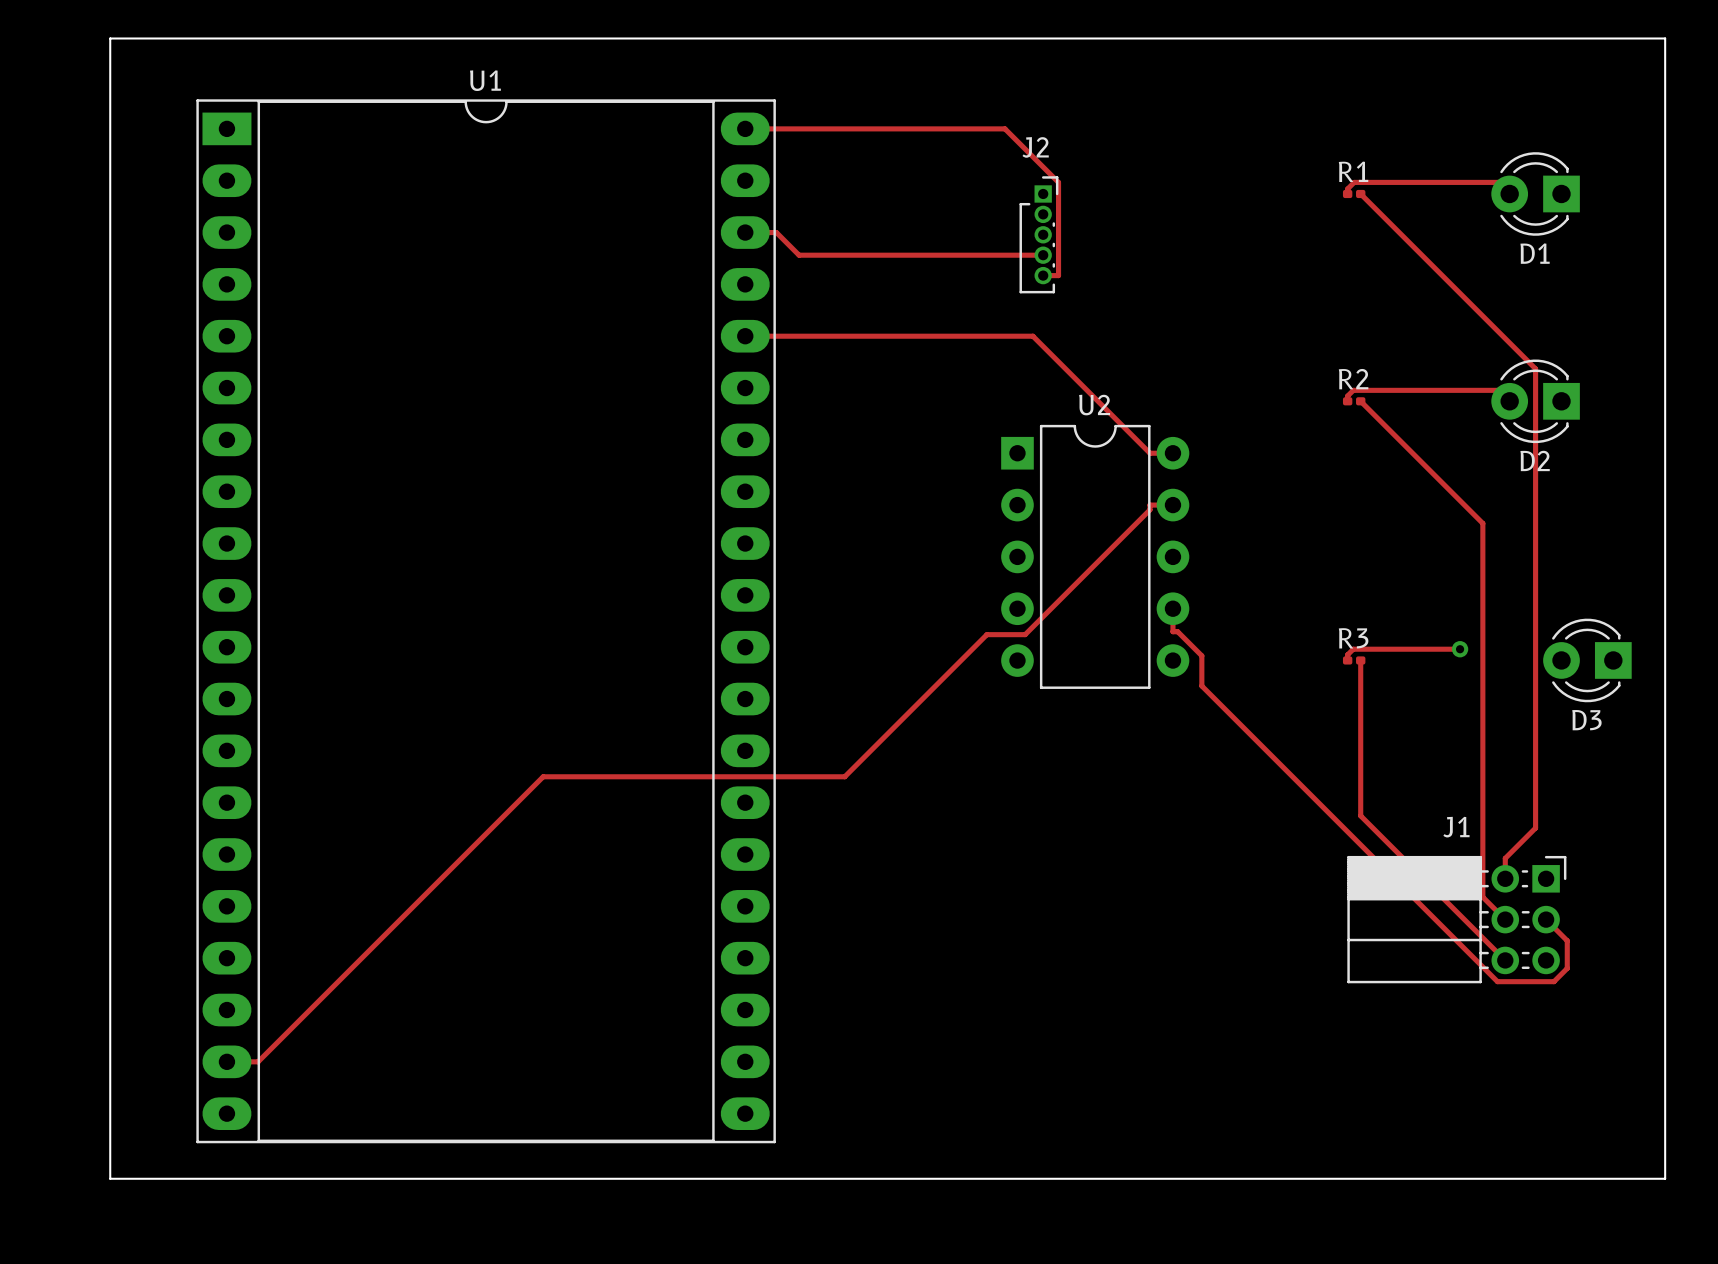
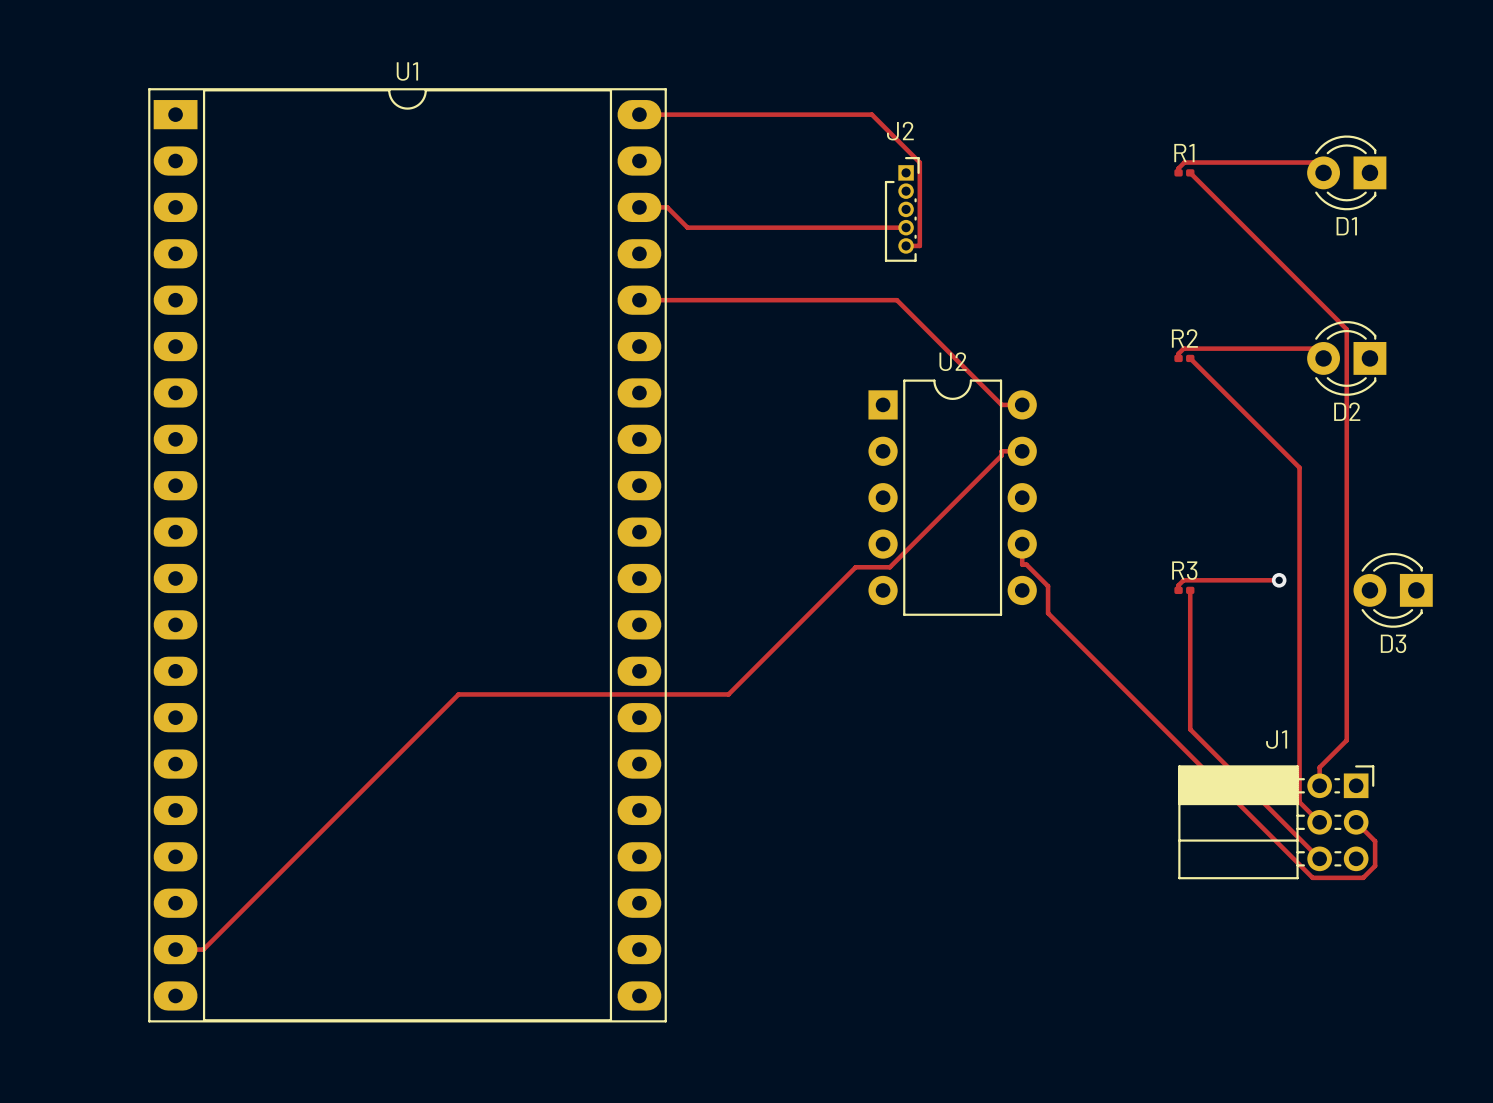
board edge: (110, 38) (1665, 38) (1665, 1178) (110, 1178) (110, 38) -> none

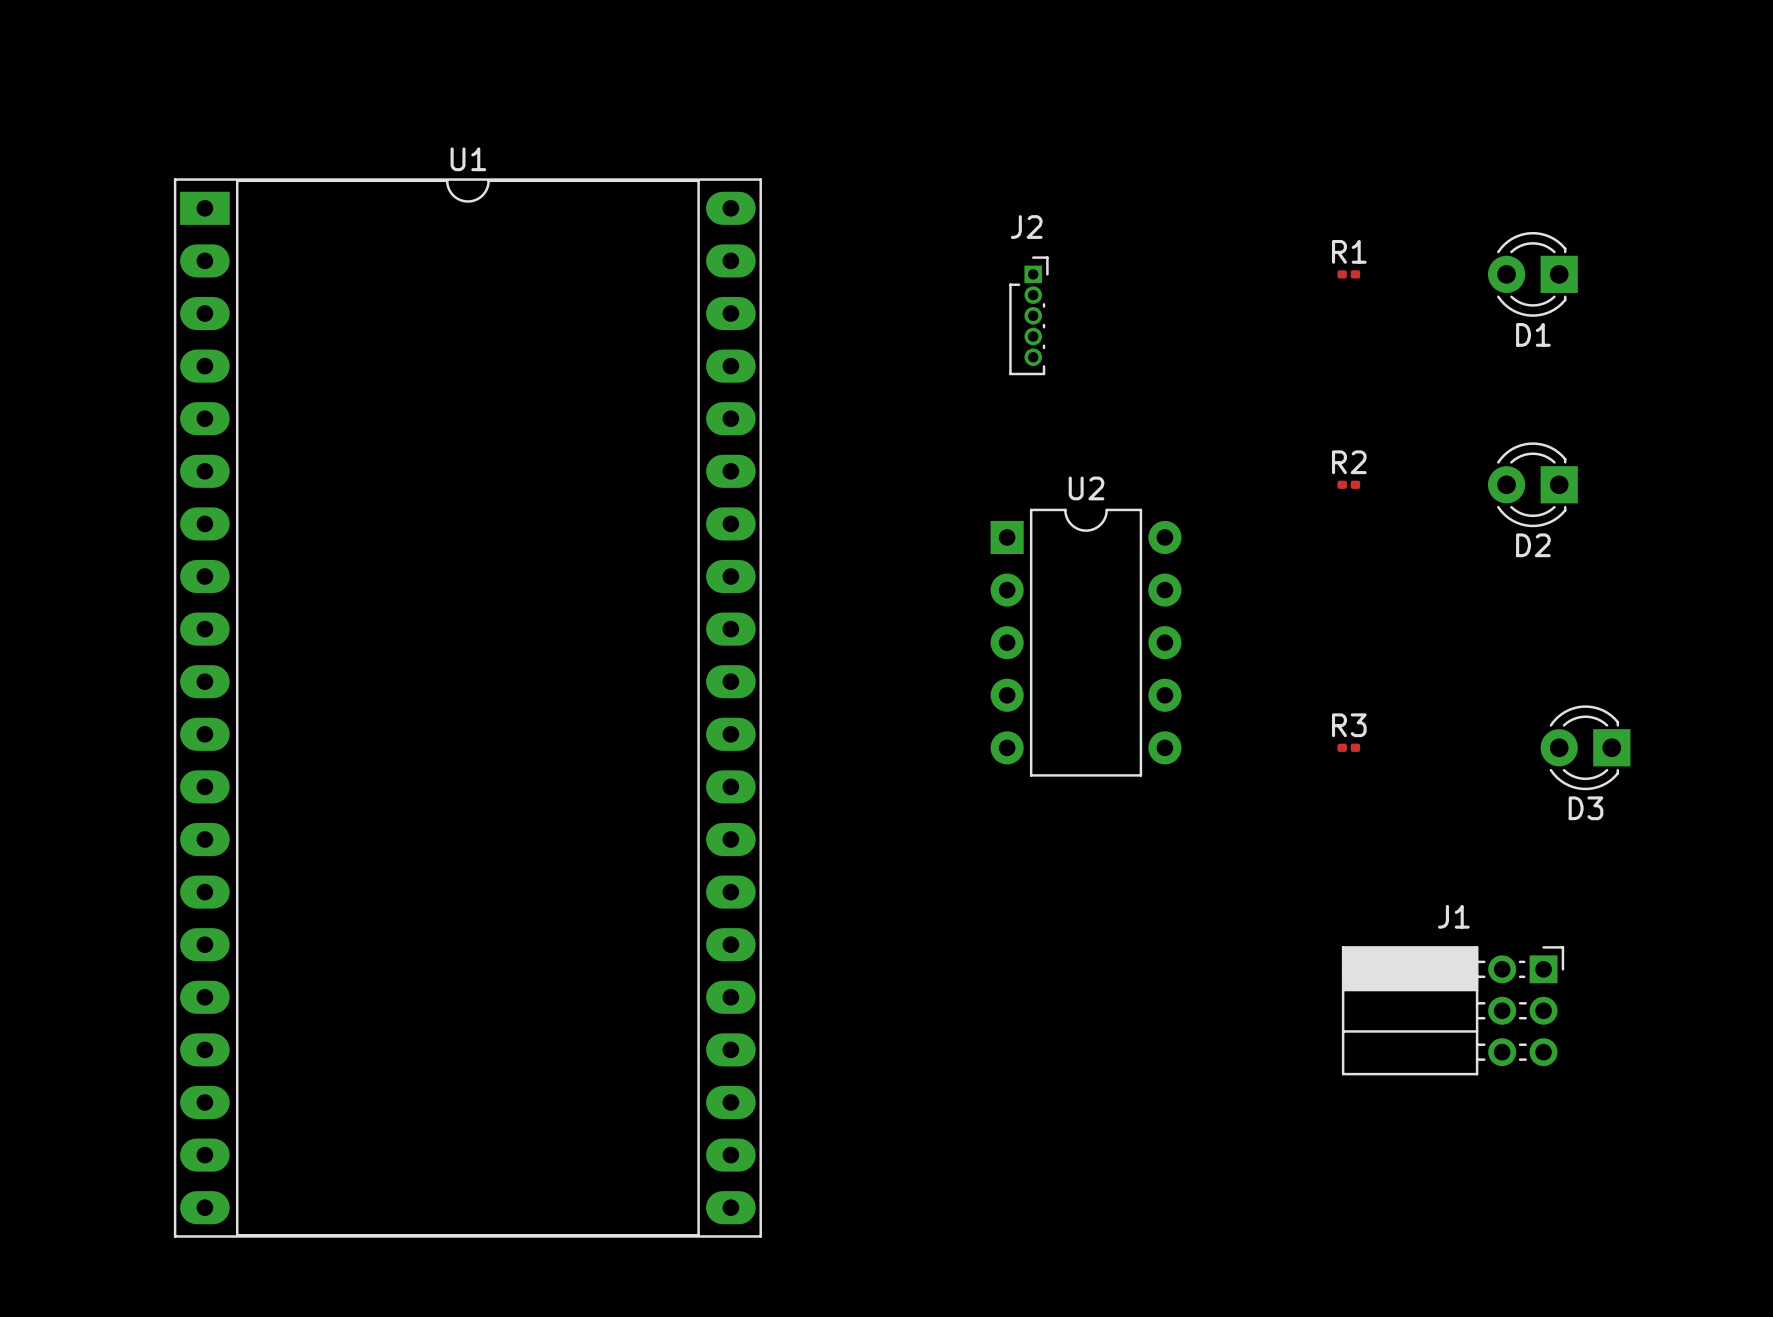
track: (639, 114) (871, 114) (919, 162) (919, 245) (906, 245) -> none
track: (1178, 172) (1178, 168) (1184, 162) (1313, 162) (1323, 172) -> none
track: (1190, 172) (1346, 329) (1346, 740) (1319, 767) (1319, 785) -> none
track: (639, 207) (667, 207) (687, 227) (906, 227) -> none
track: (639, 300) (896, 300) (1001, 404) (1022, 404) -> none
track: (1178, 358) (1178, 353) (1183, 348) (1313, 348) (1323, 358) -> none
track: (1190, 358) (1299, 467) (1299, 802) (1319, 822) -> none
track: (1022, 451) (1001, 451) (1001, 455) (889, 567) (855, 567) (728, 694) (458, 694) (203, 949) (175, 949) -> none
track: (1022, 544) (1022, 564) (1026, 564) (1048, 586) (1048, 613) (1312, 877) (1363, 877) (1375, 865) (1375, 841) (1356, 822) -> none
track: (1279, 580) (1183, 580) (1178, 585) (1178, 590) -> none
via: (1279, 580) -> none
track: (1190, 590) (1190, 729) (1319, 858) -> none

